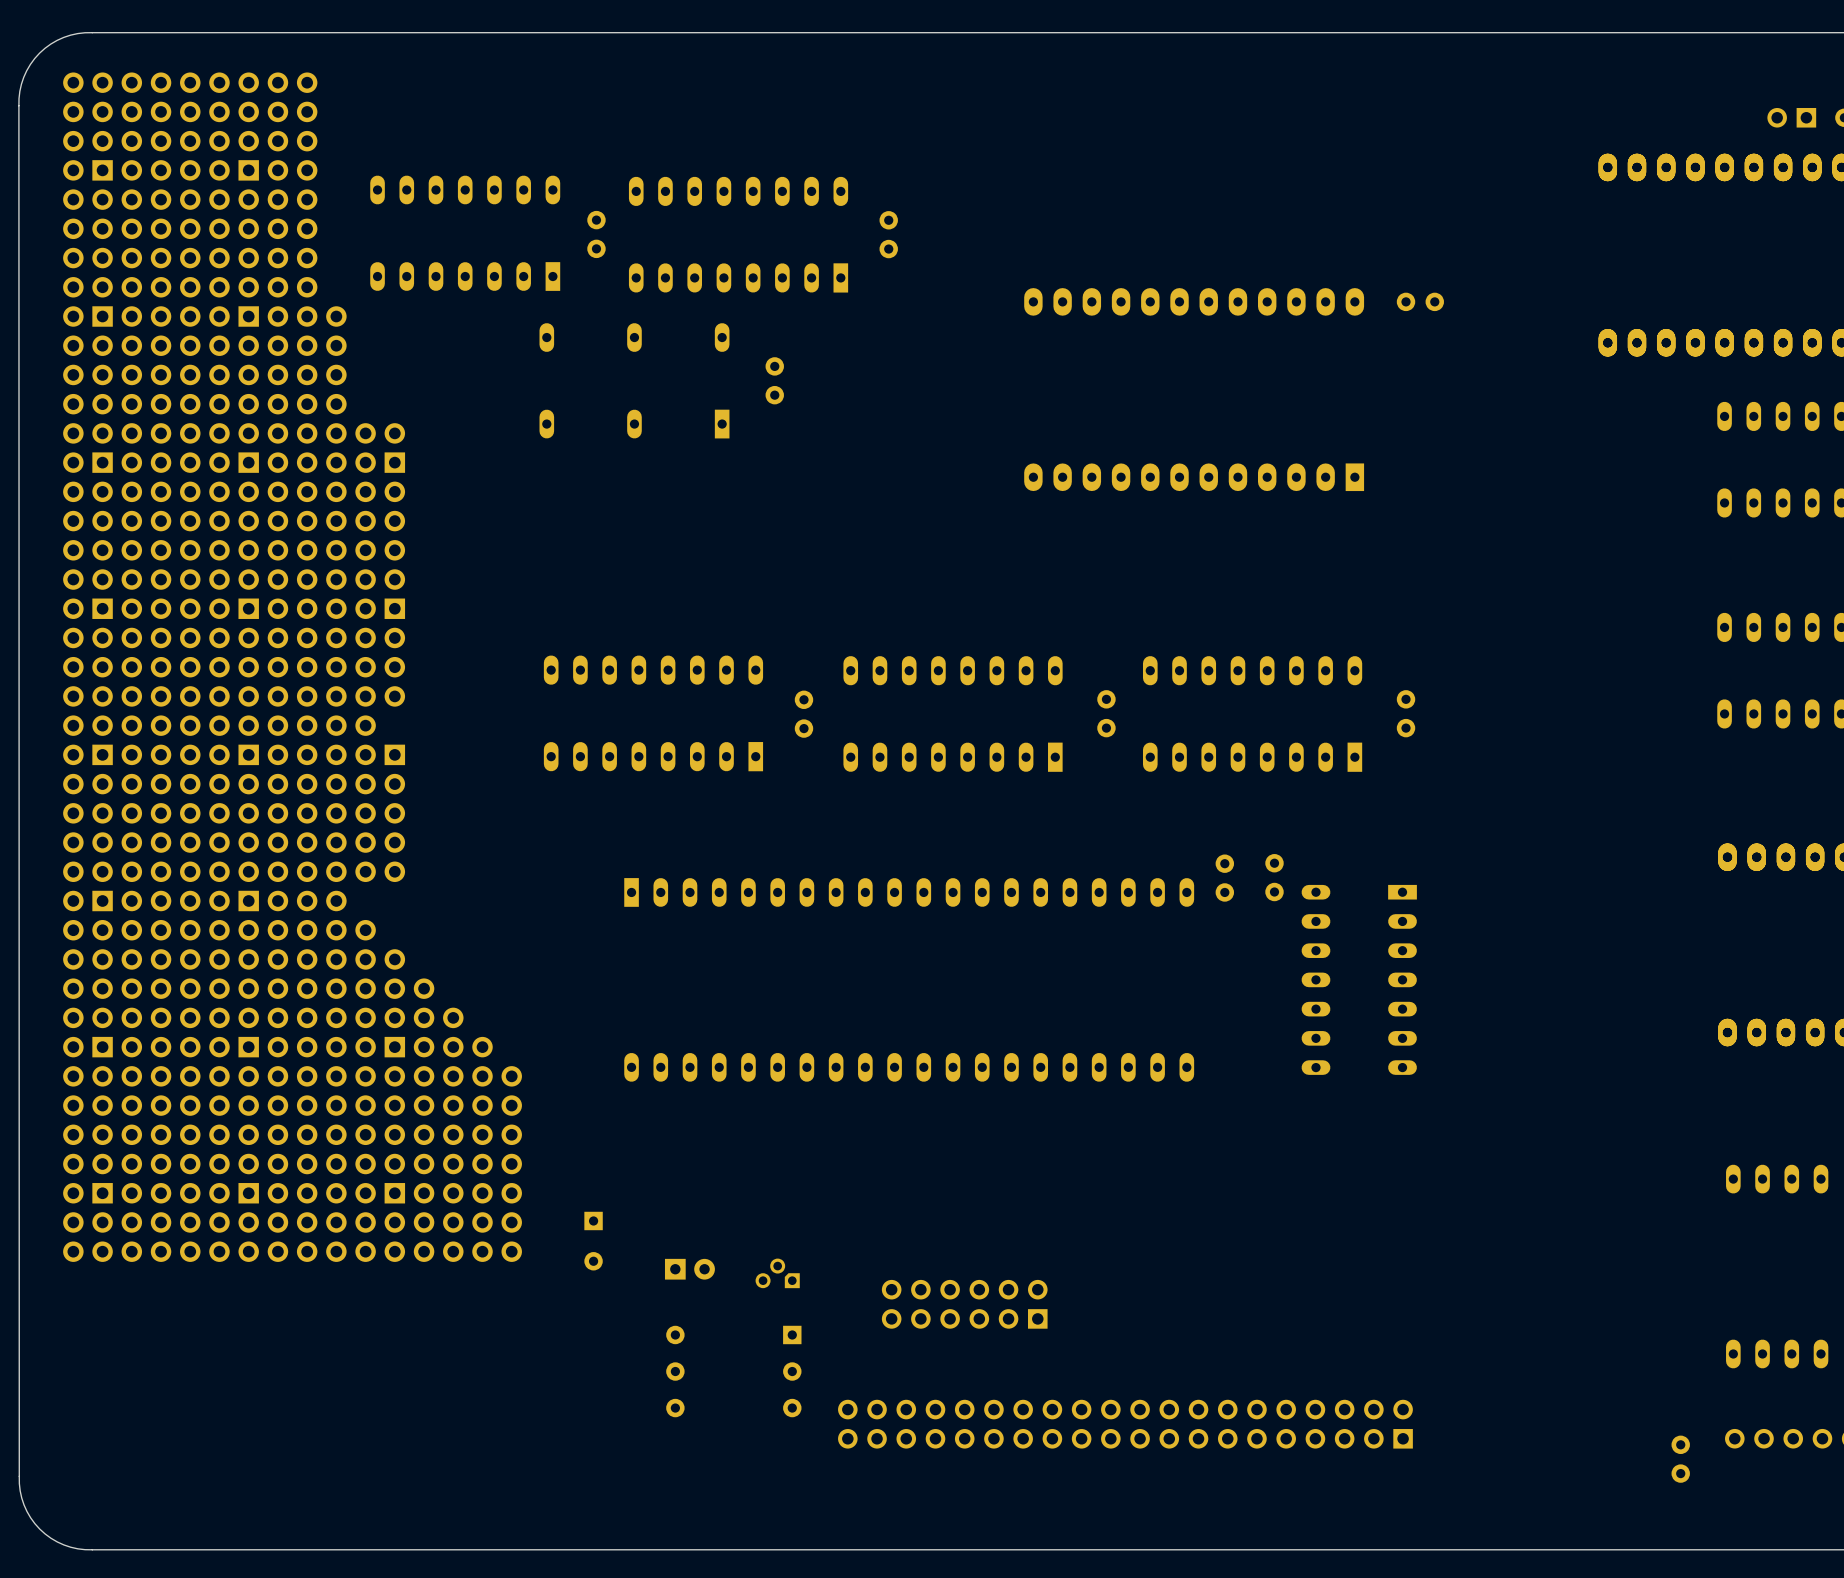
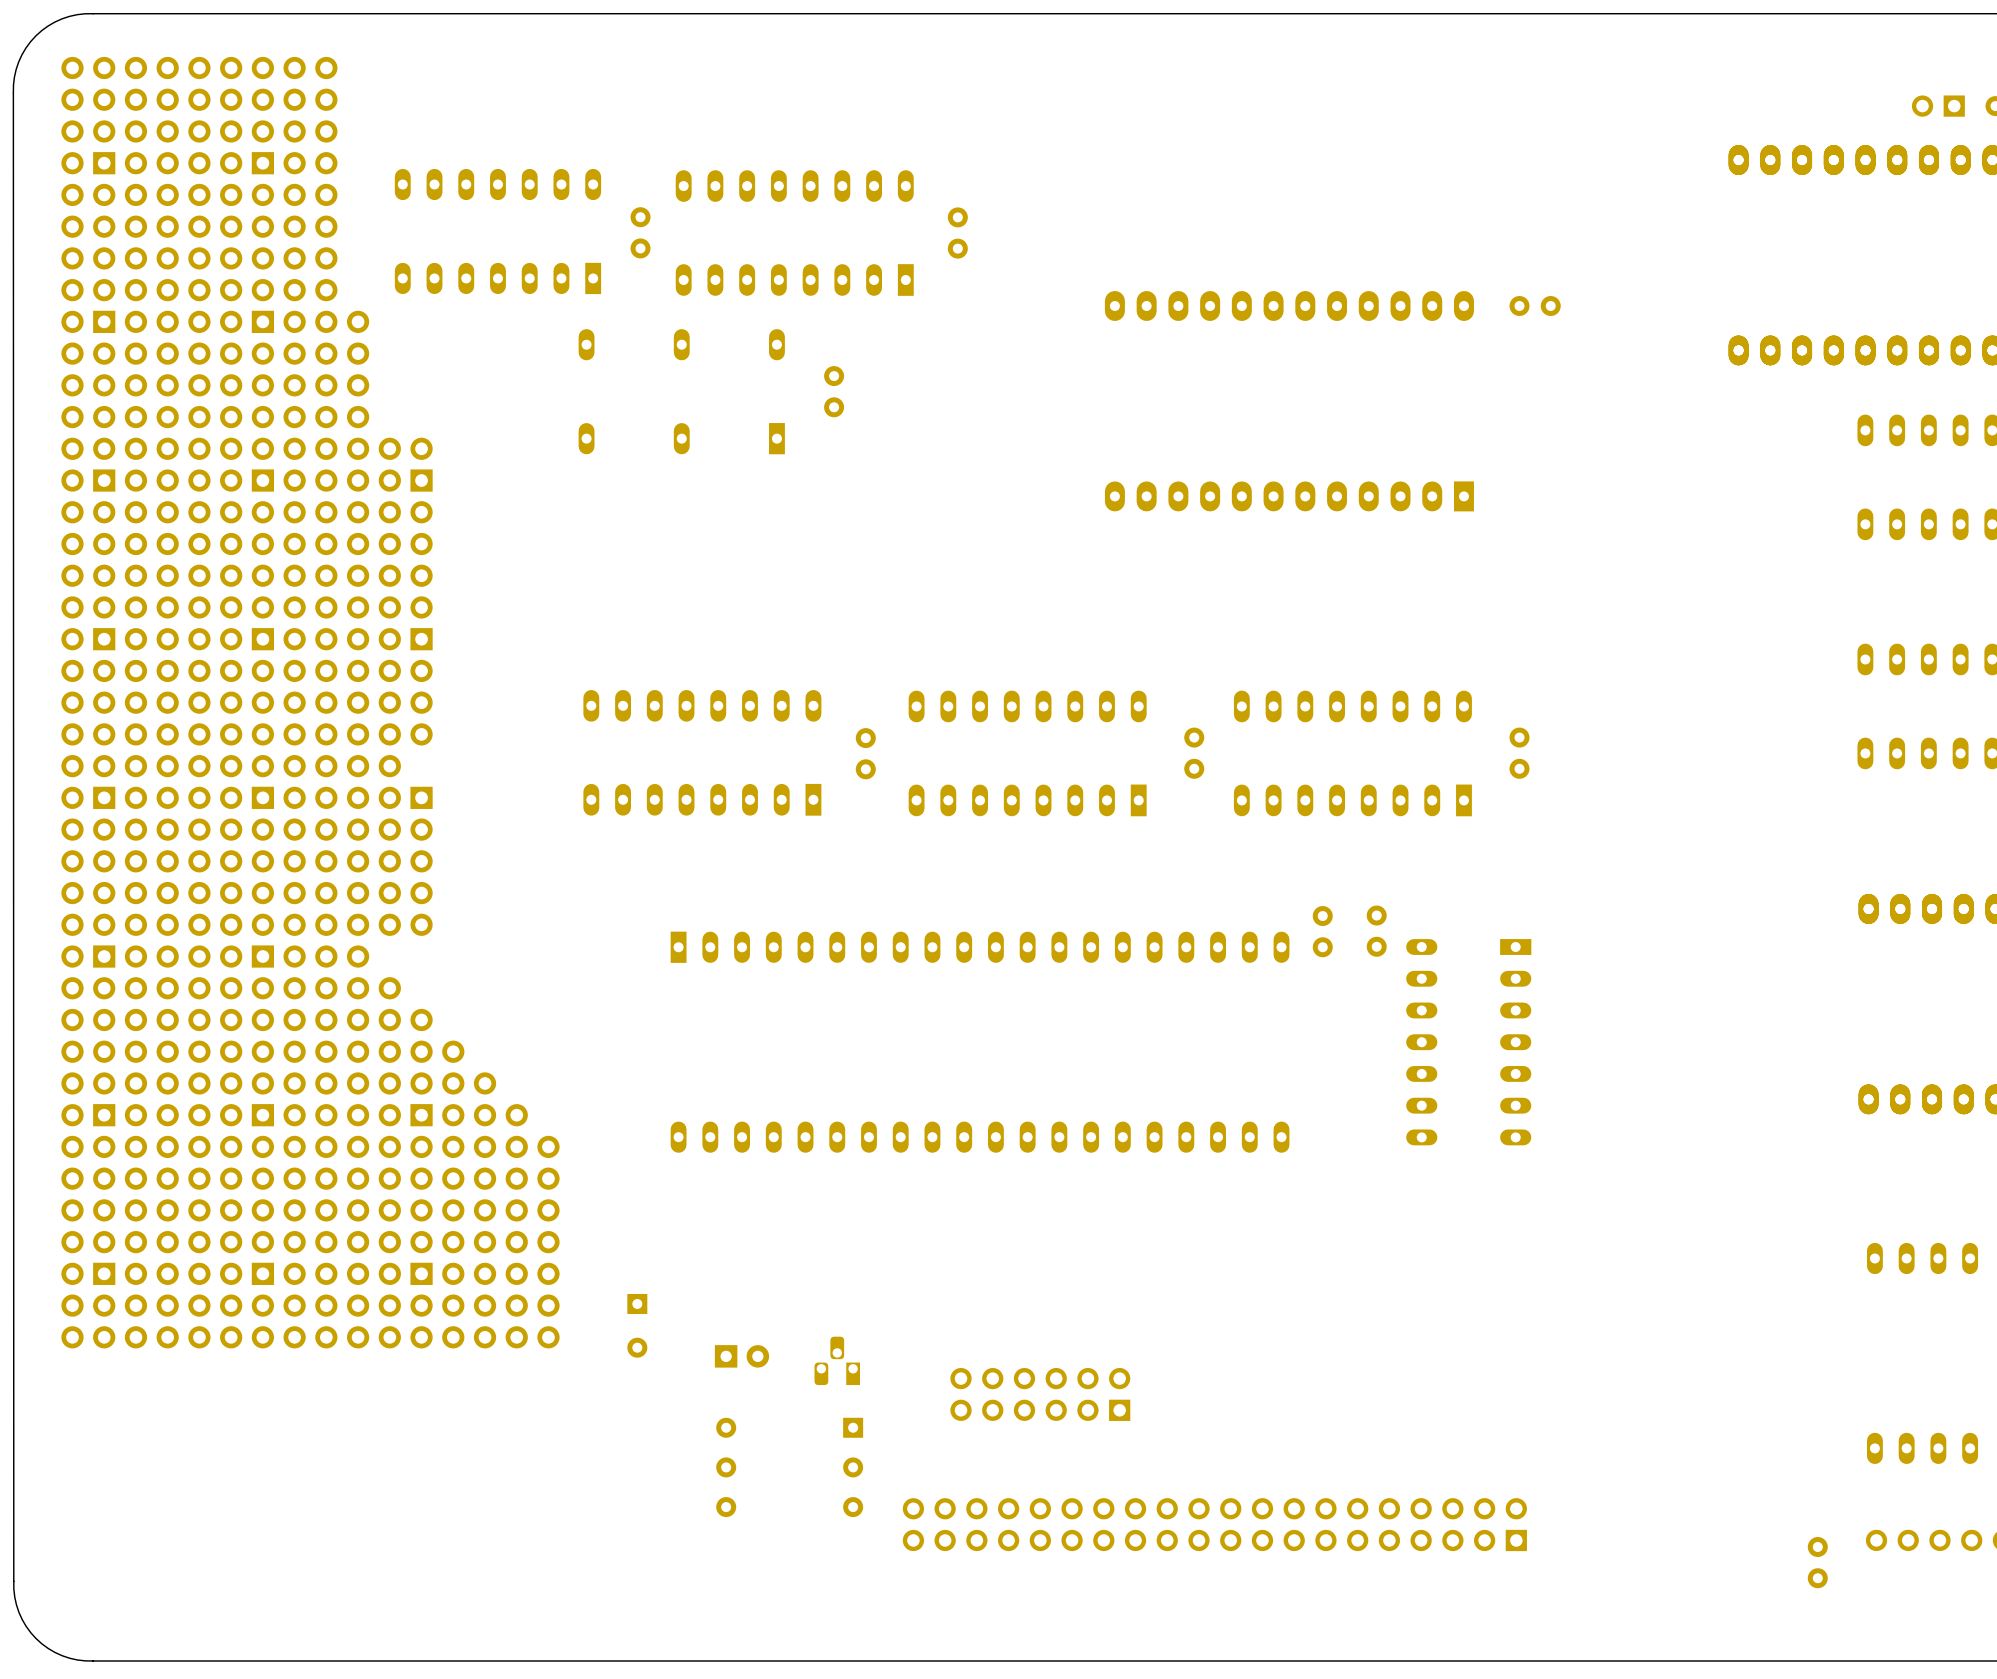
part footprint: [755, 1258, 800, 1289] -> [814, 1336, 860, 1386]

